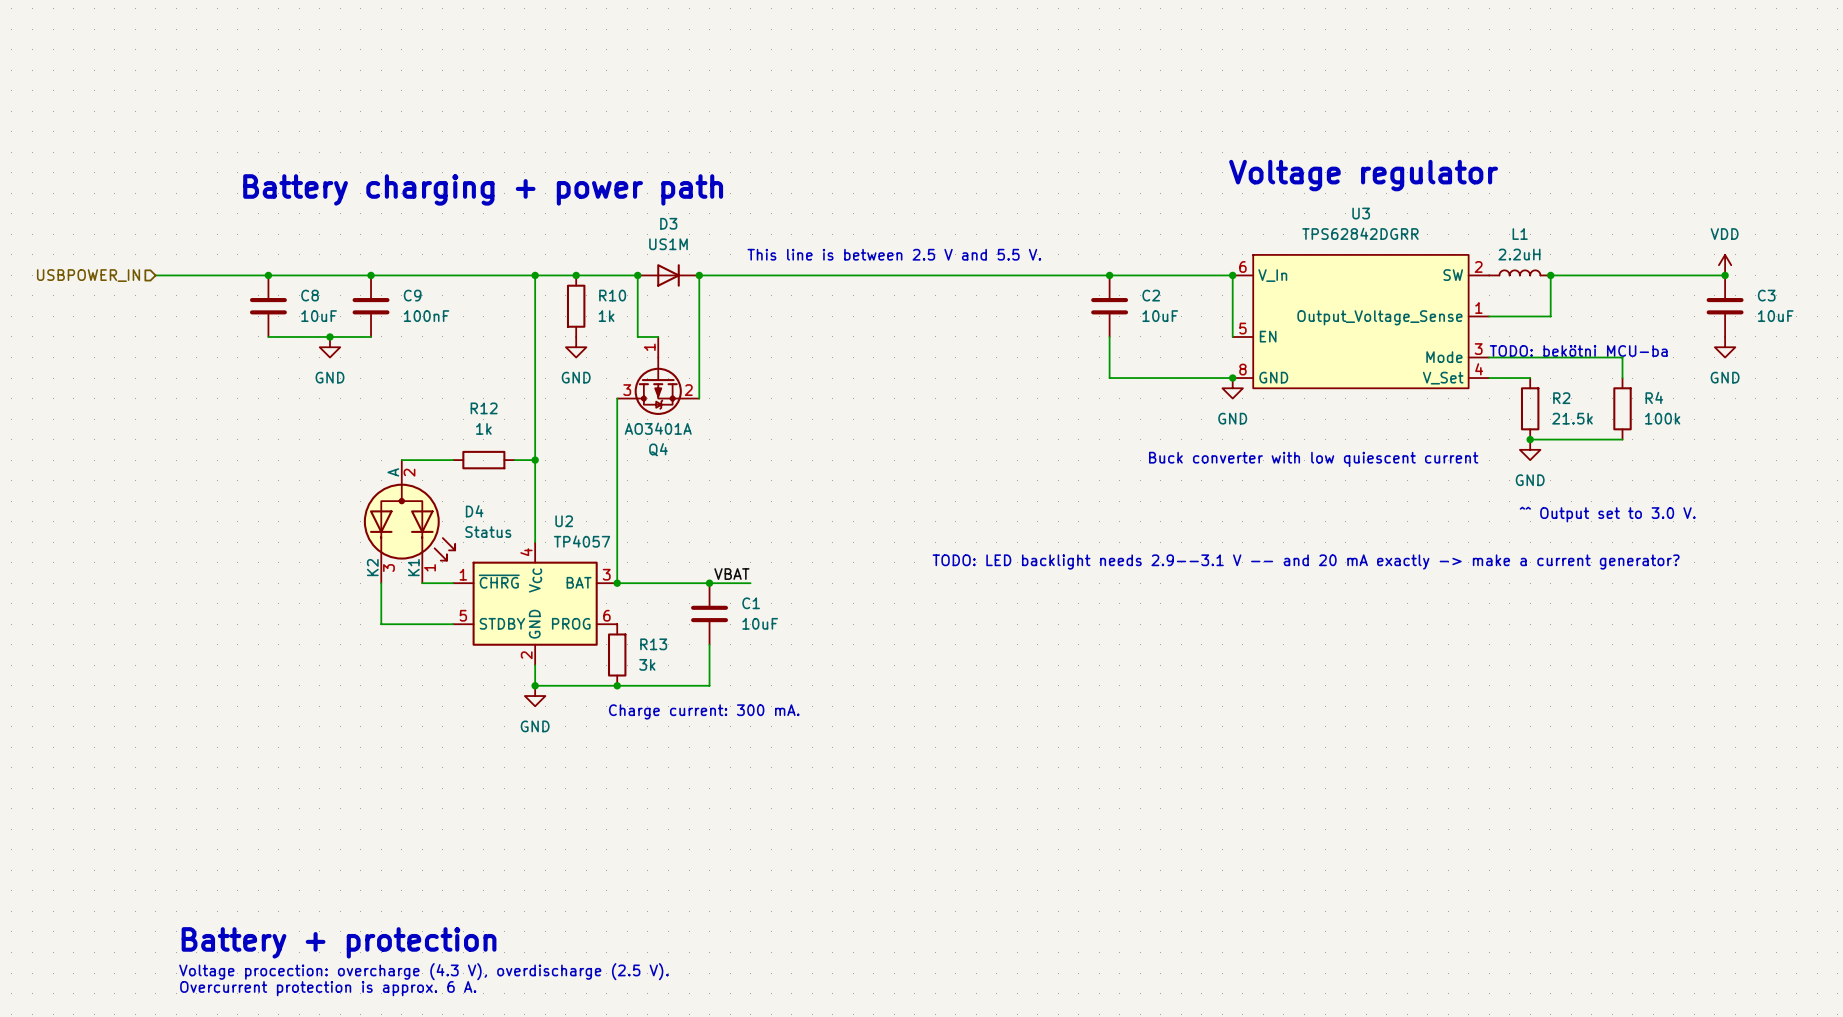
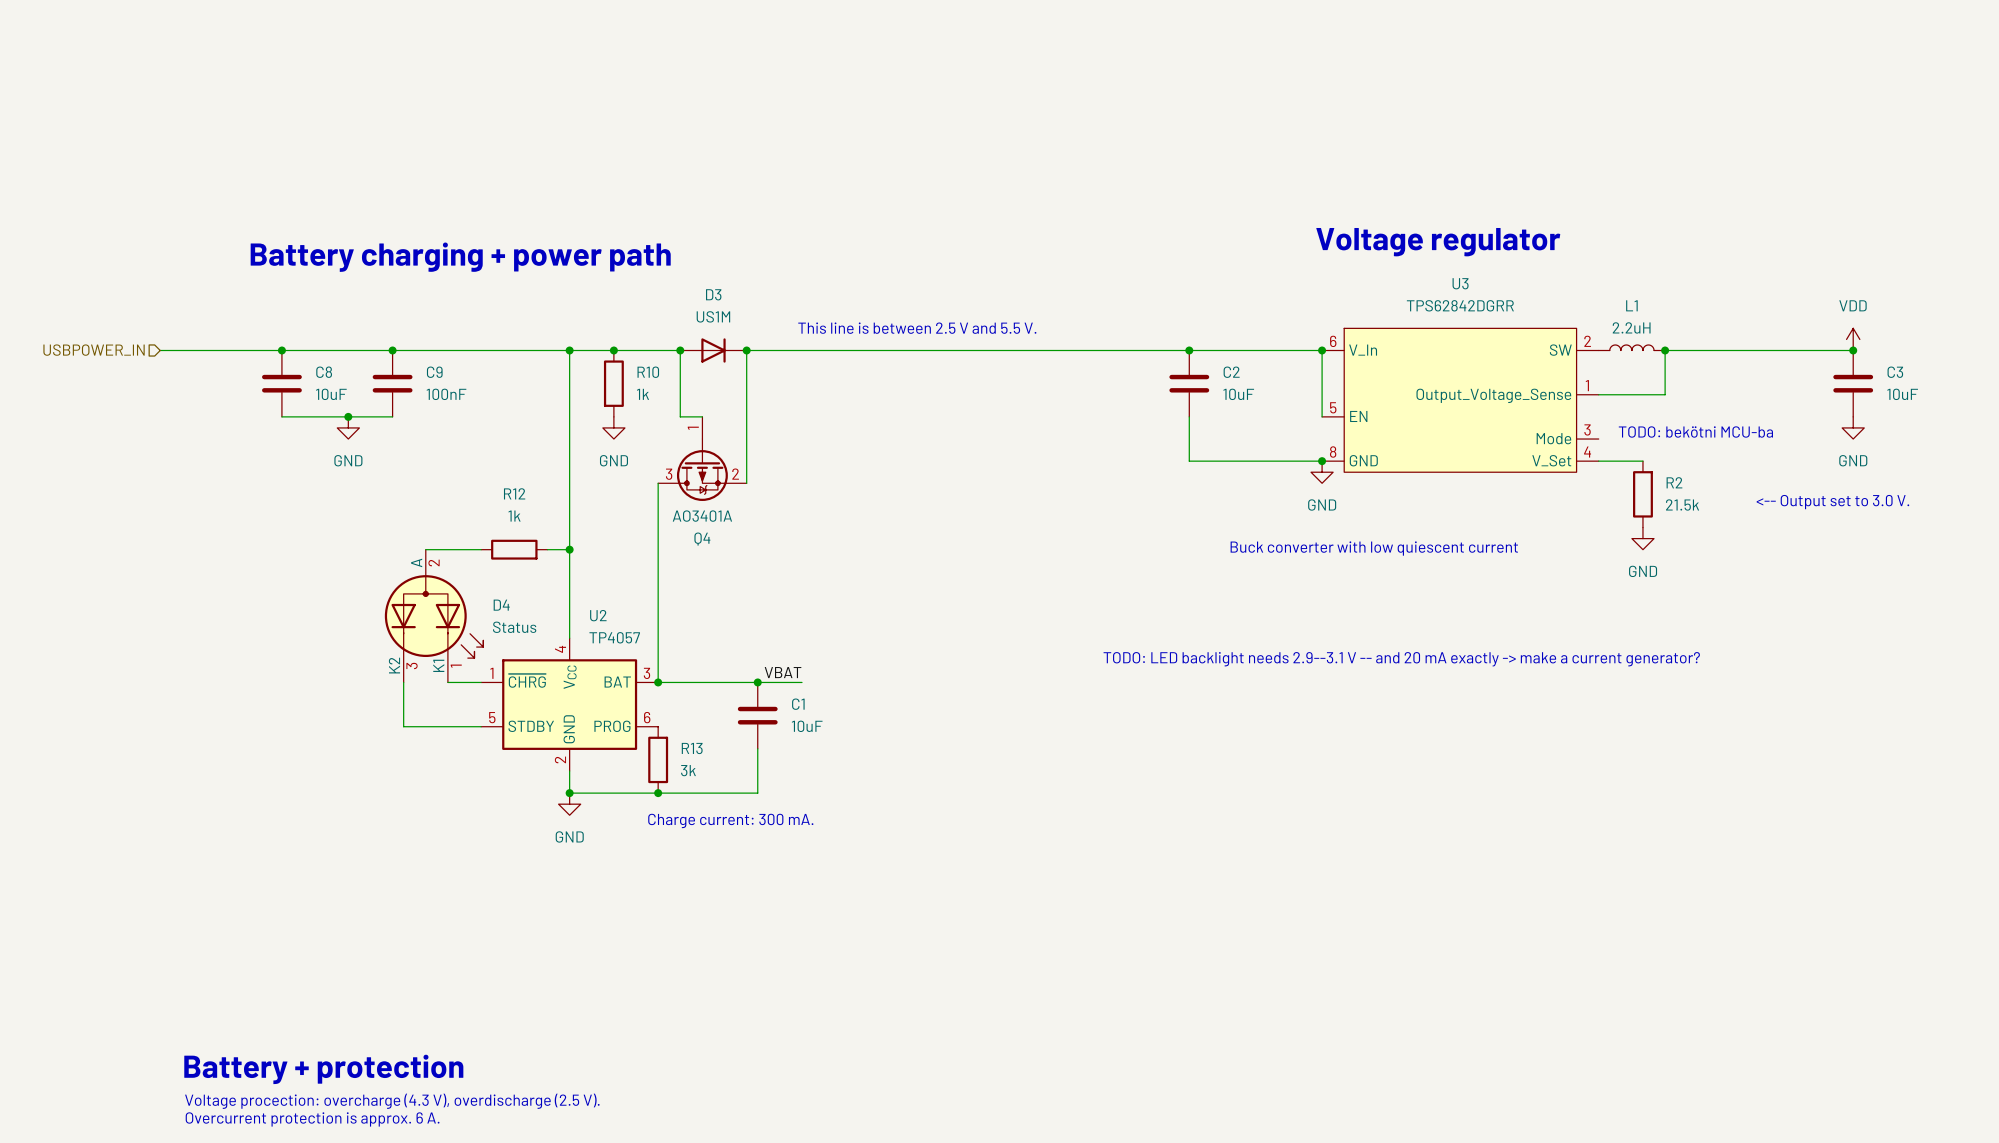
wire: (1489, 357) (1622, 357) (1622, 378) -> none
R4: 100k (1622, 408) -> none
text: none -> <-- Output set to 3.0 V. (1832, 502)
wire: (1530, 439) (1622, 439) -> none
junction: (1530, 439) -> none
text: ^^ Output set to 3.0 V. (1607, 514) -> none

